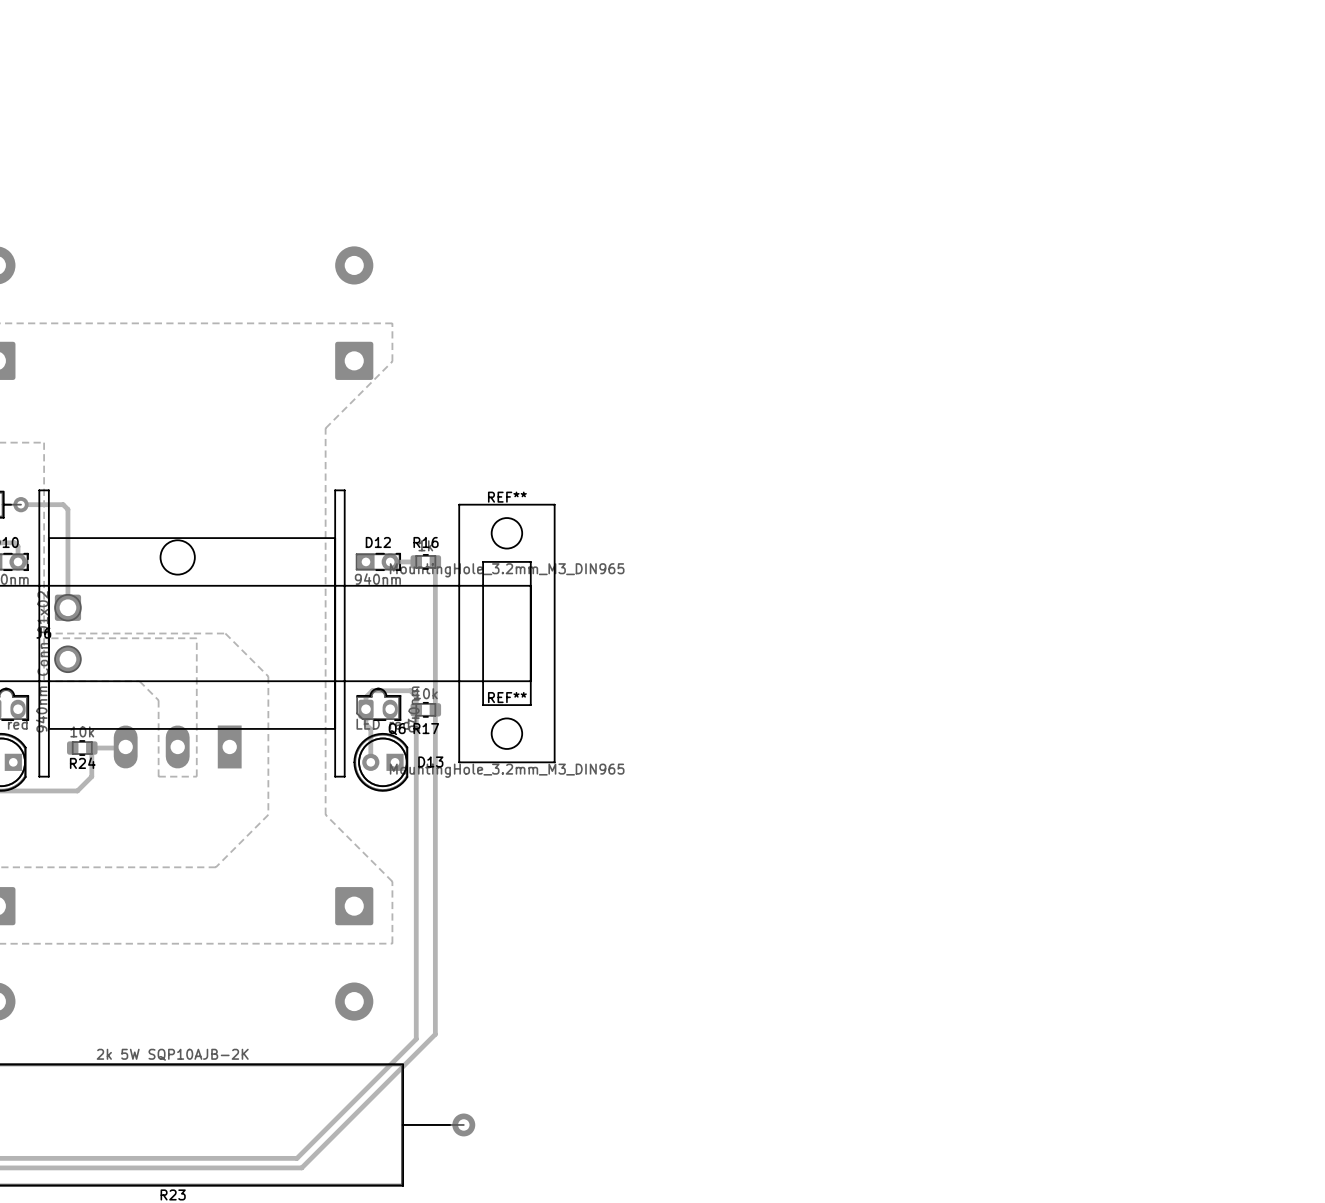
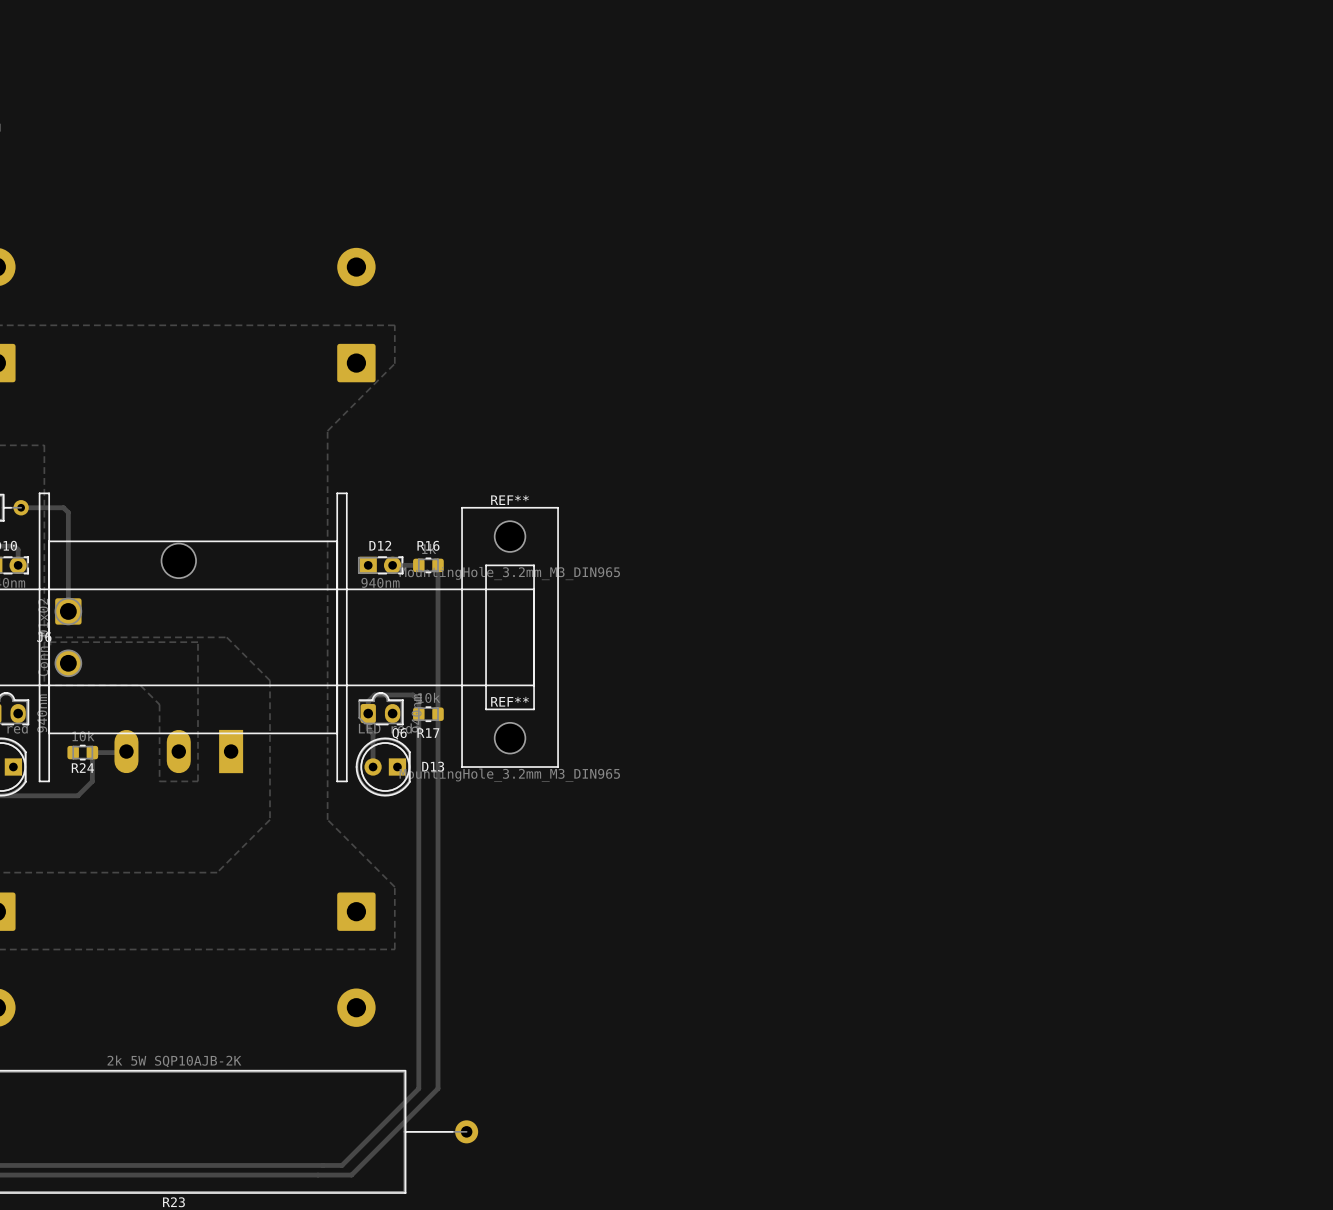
track: (435, 1034) (301, 1167) -> (438, 1040) (438, 1088) (351, 1175) (303, 1175)
track: (416, 1039) (296, 1158) -> (418, 1045) (418, 1088) (342, 1165) (298, 1165)

